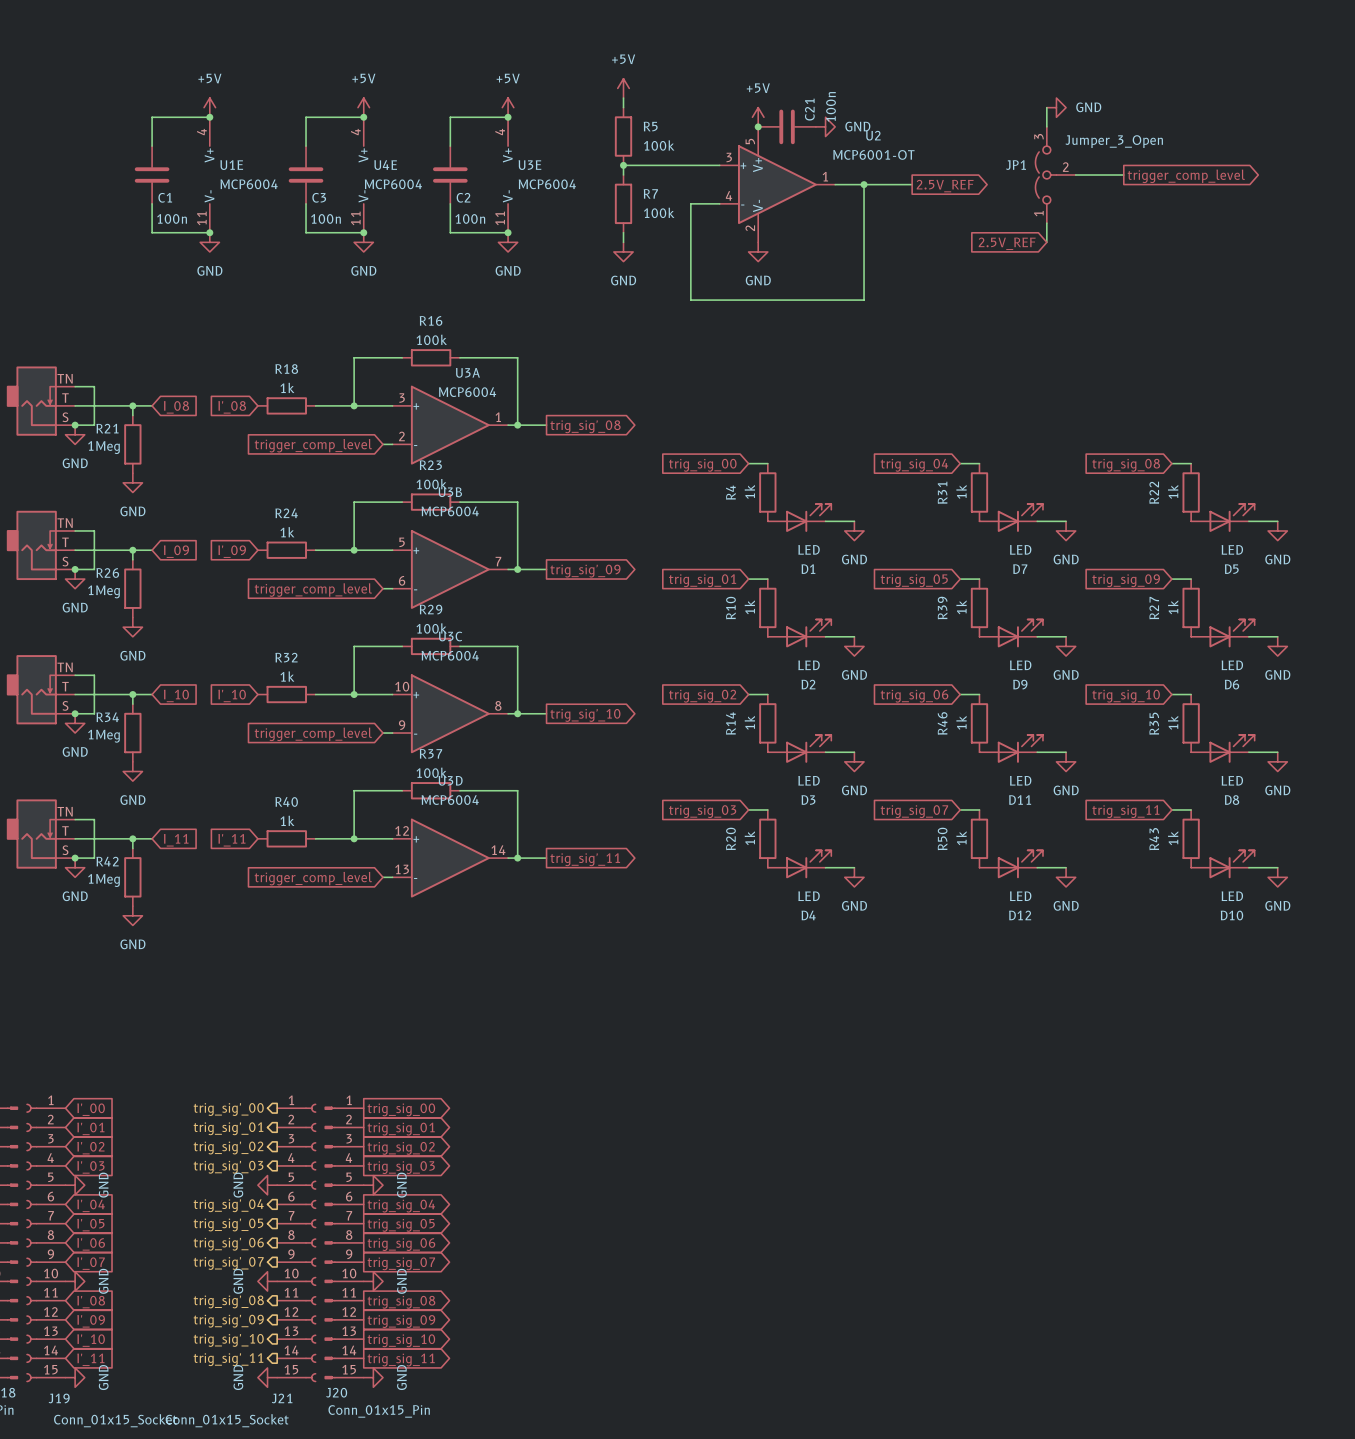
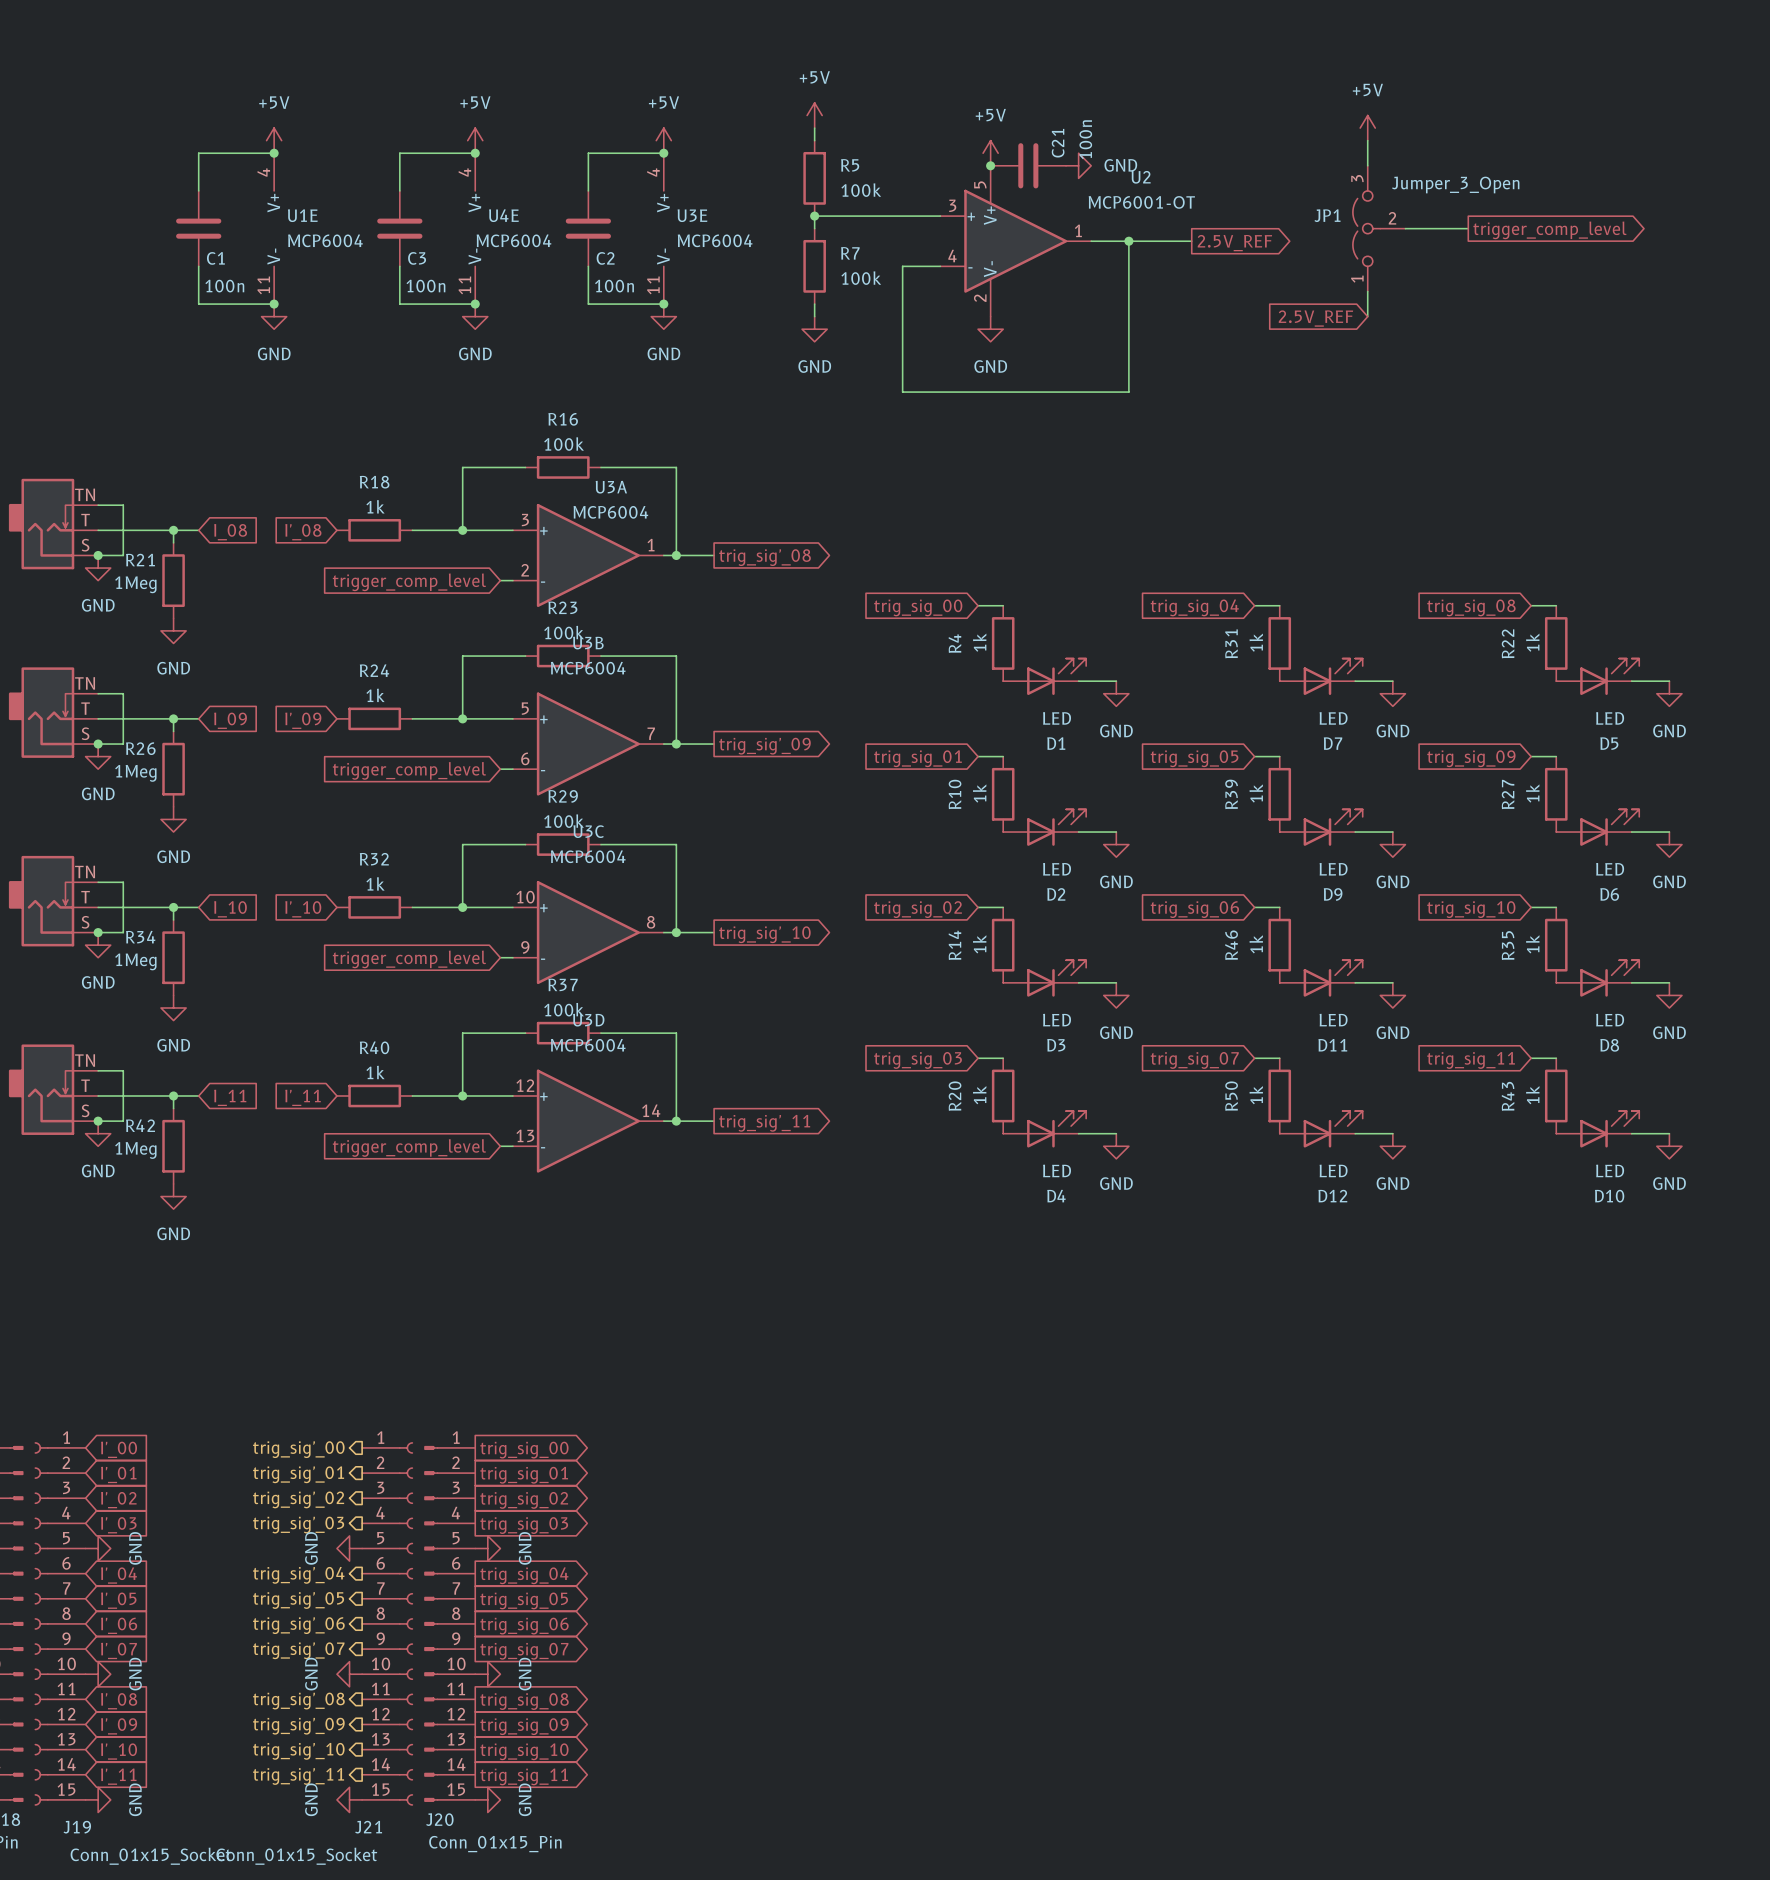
power symbol: none -> +5V (1367, 128)
power symbol: GND (1056, 107) -> none

